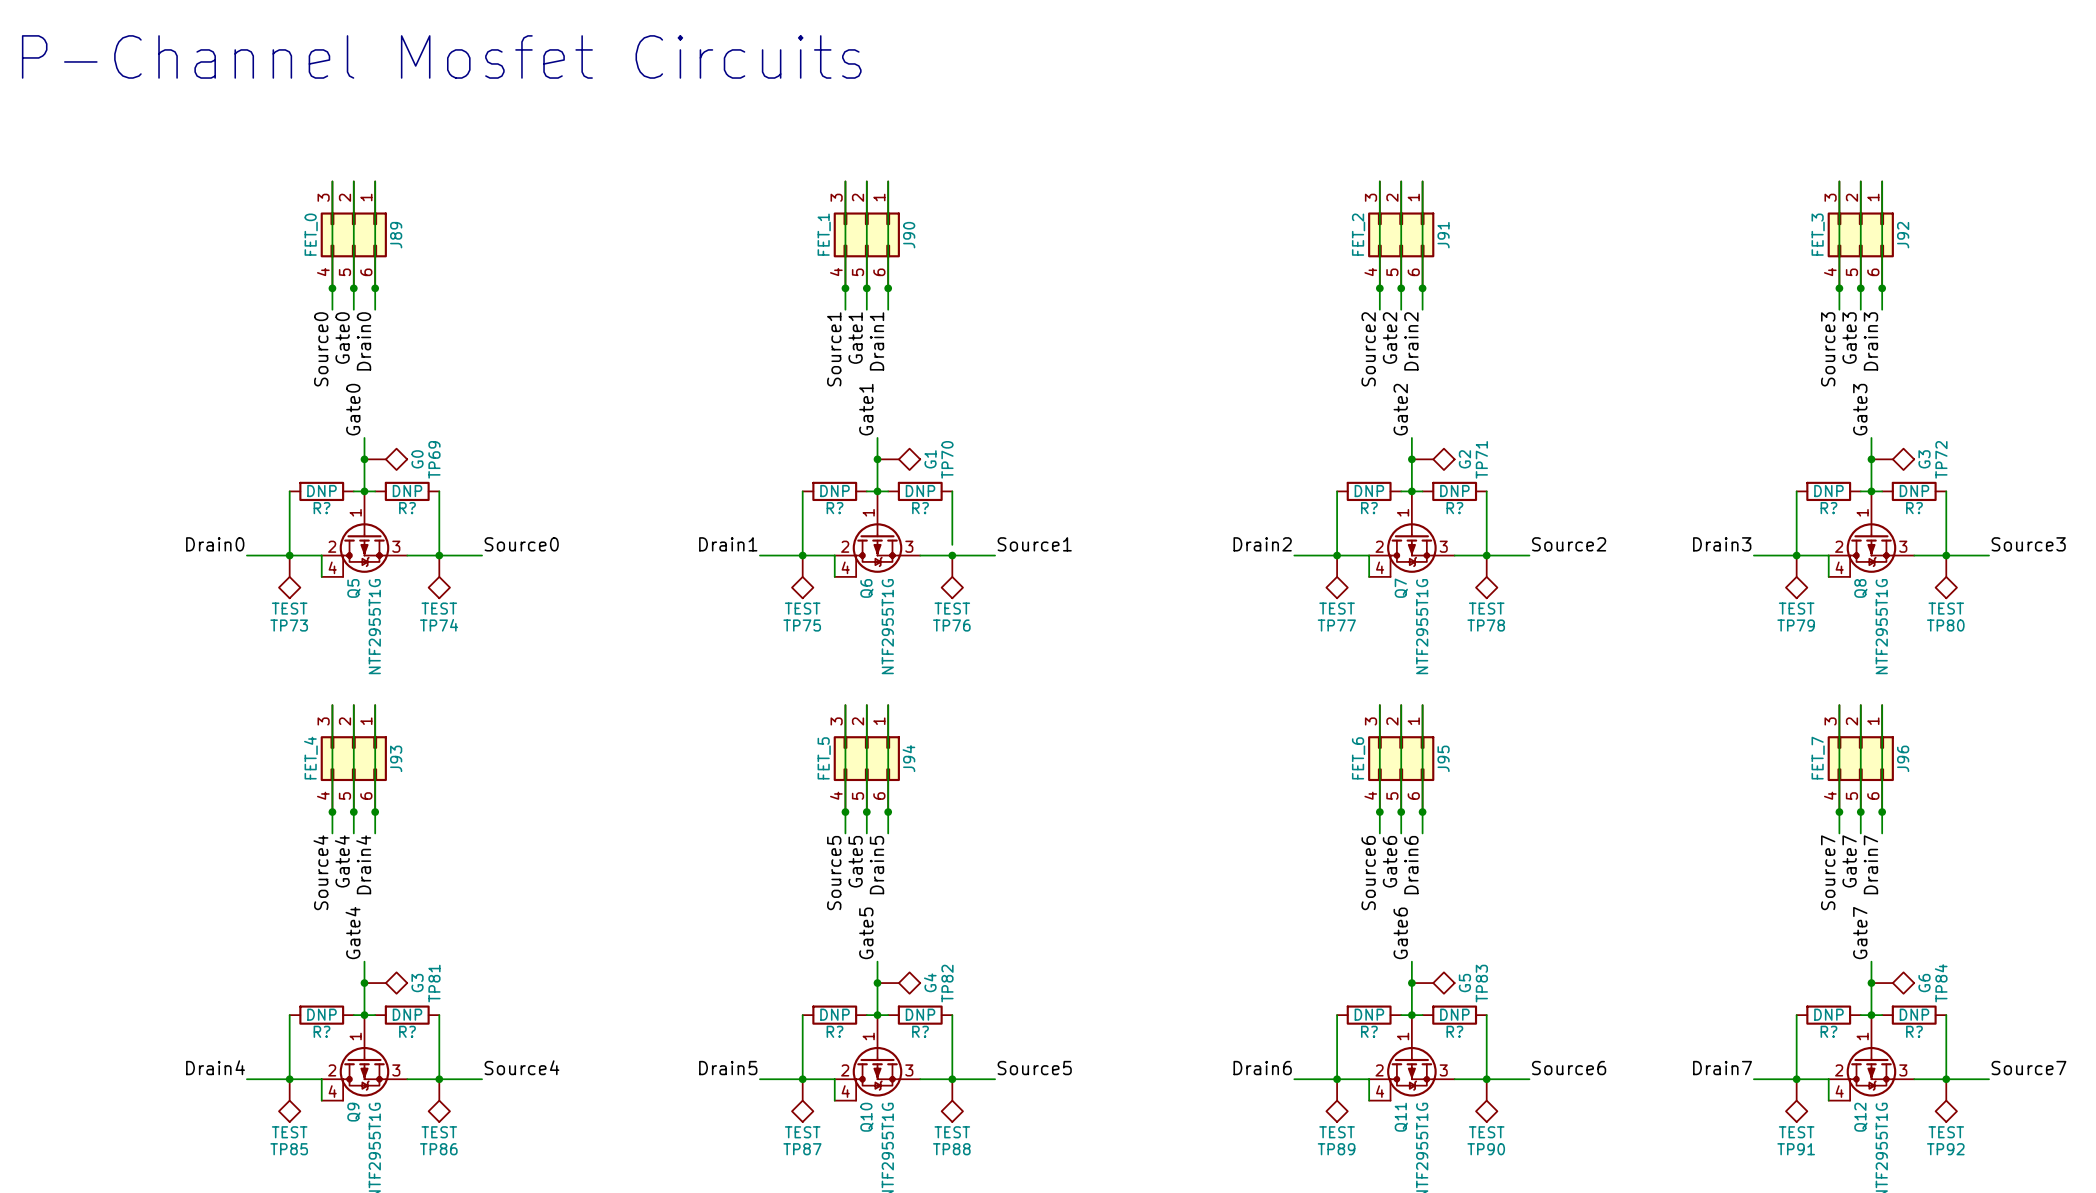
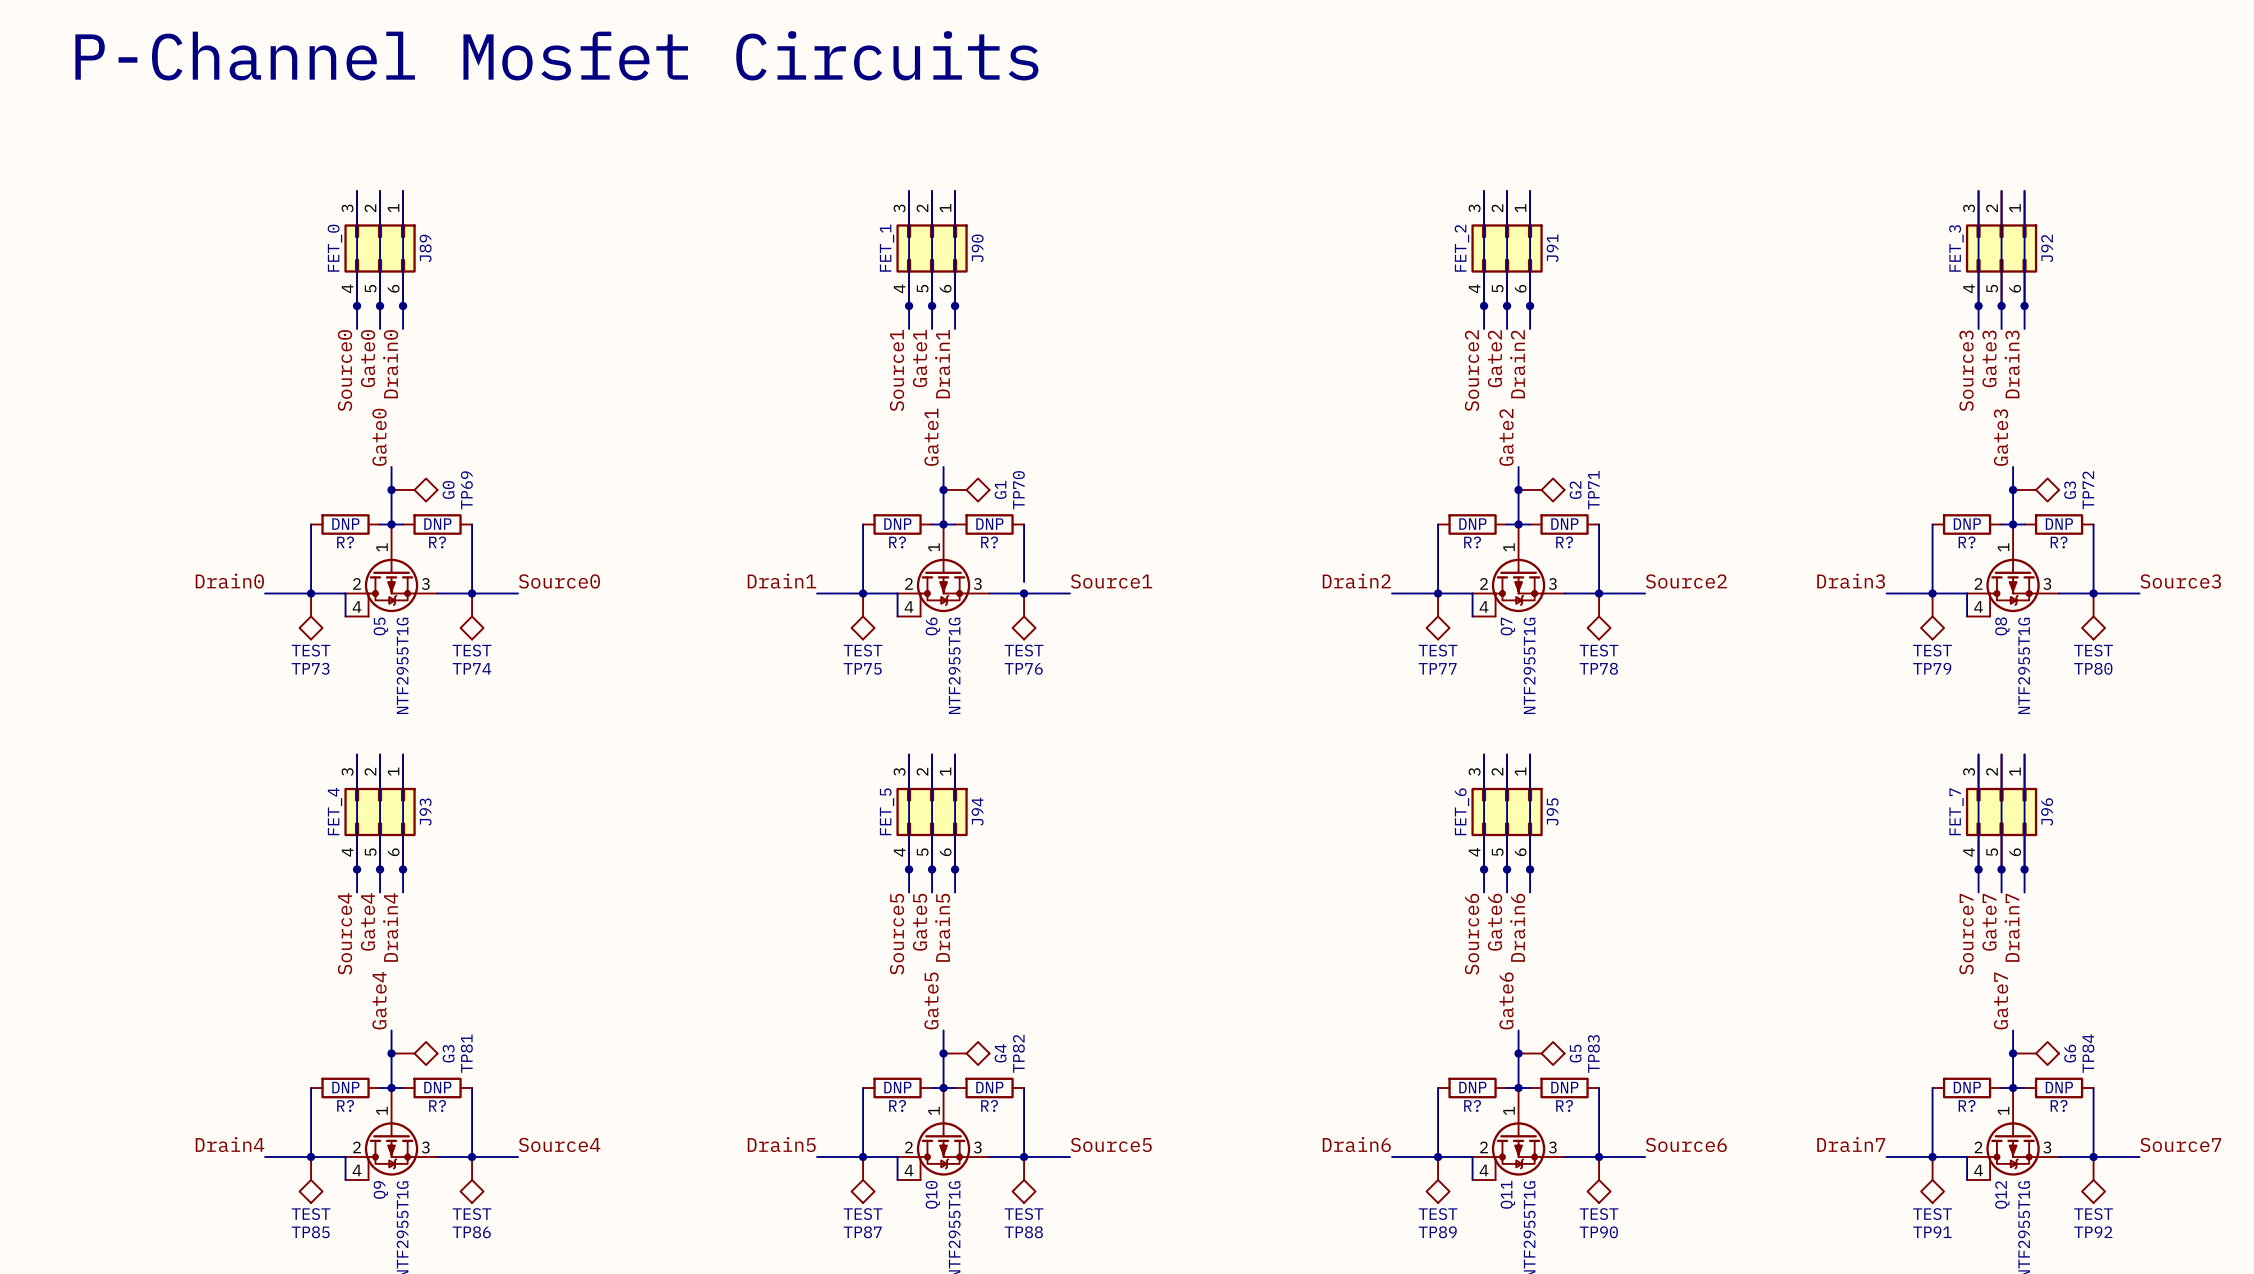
text position: P-Channel Mosfet Circuits (441, 56) -> P-Channel Mosfet Circuits (556, 55)

